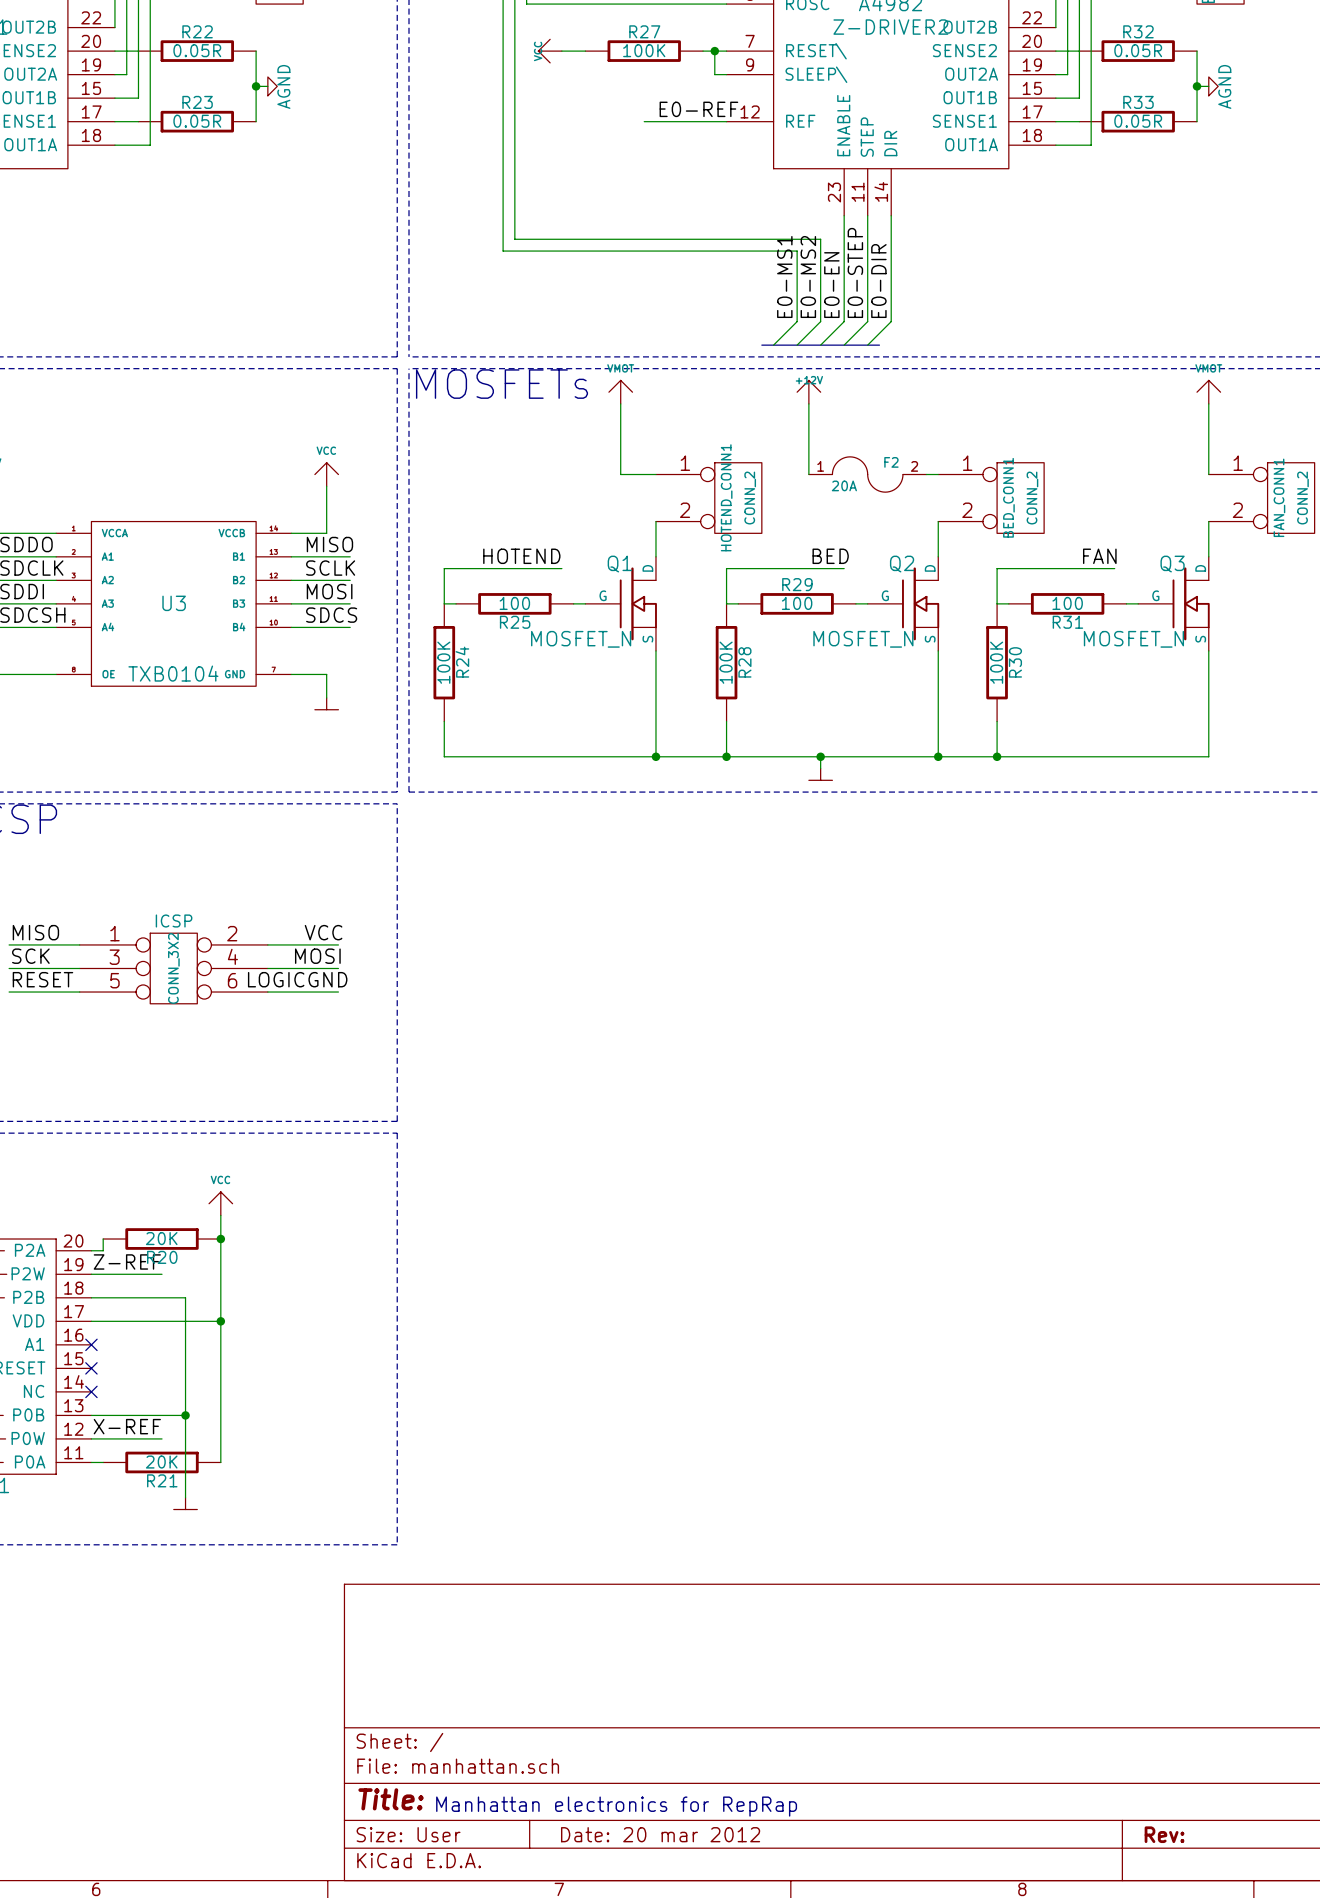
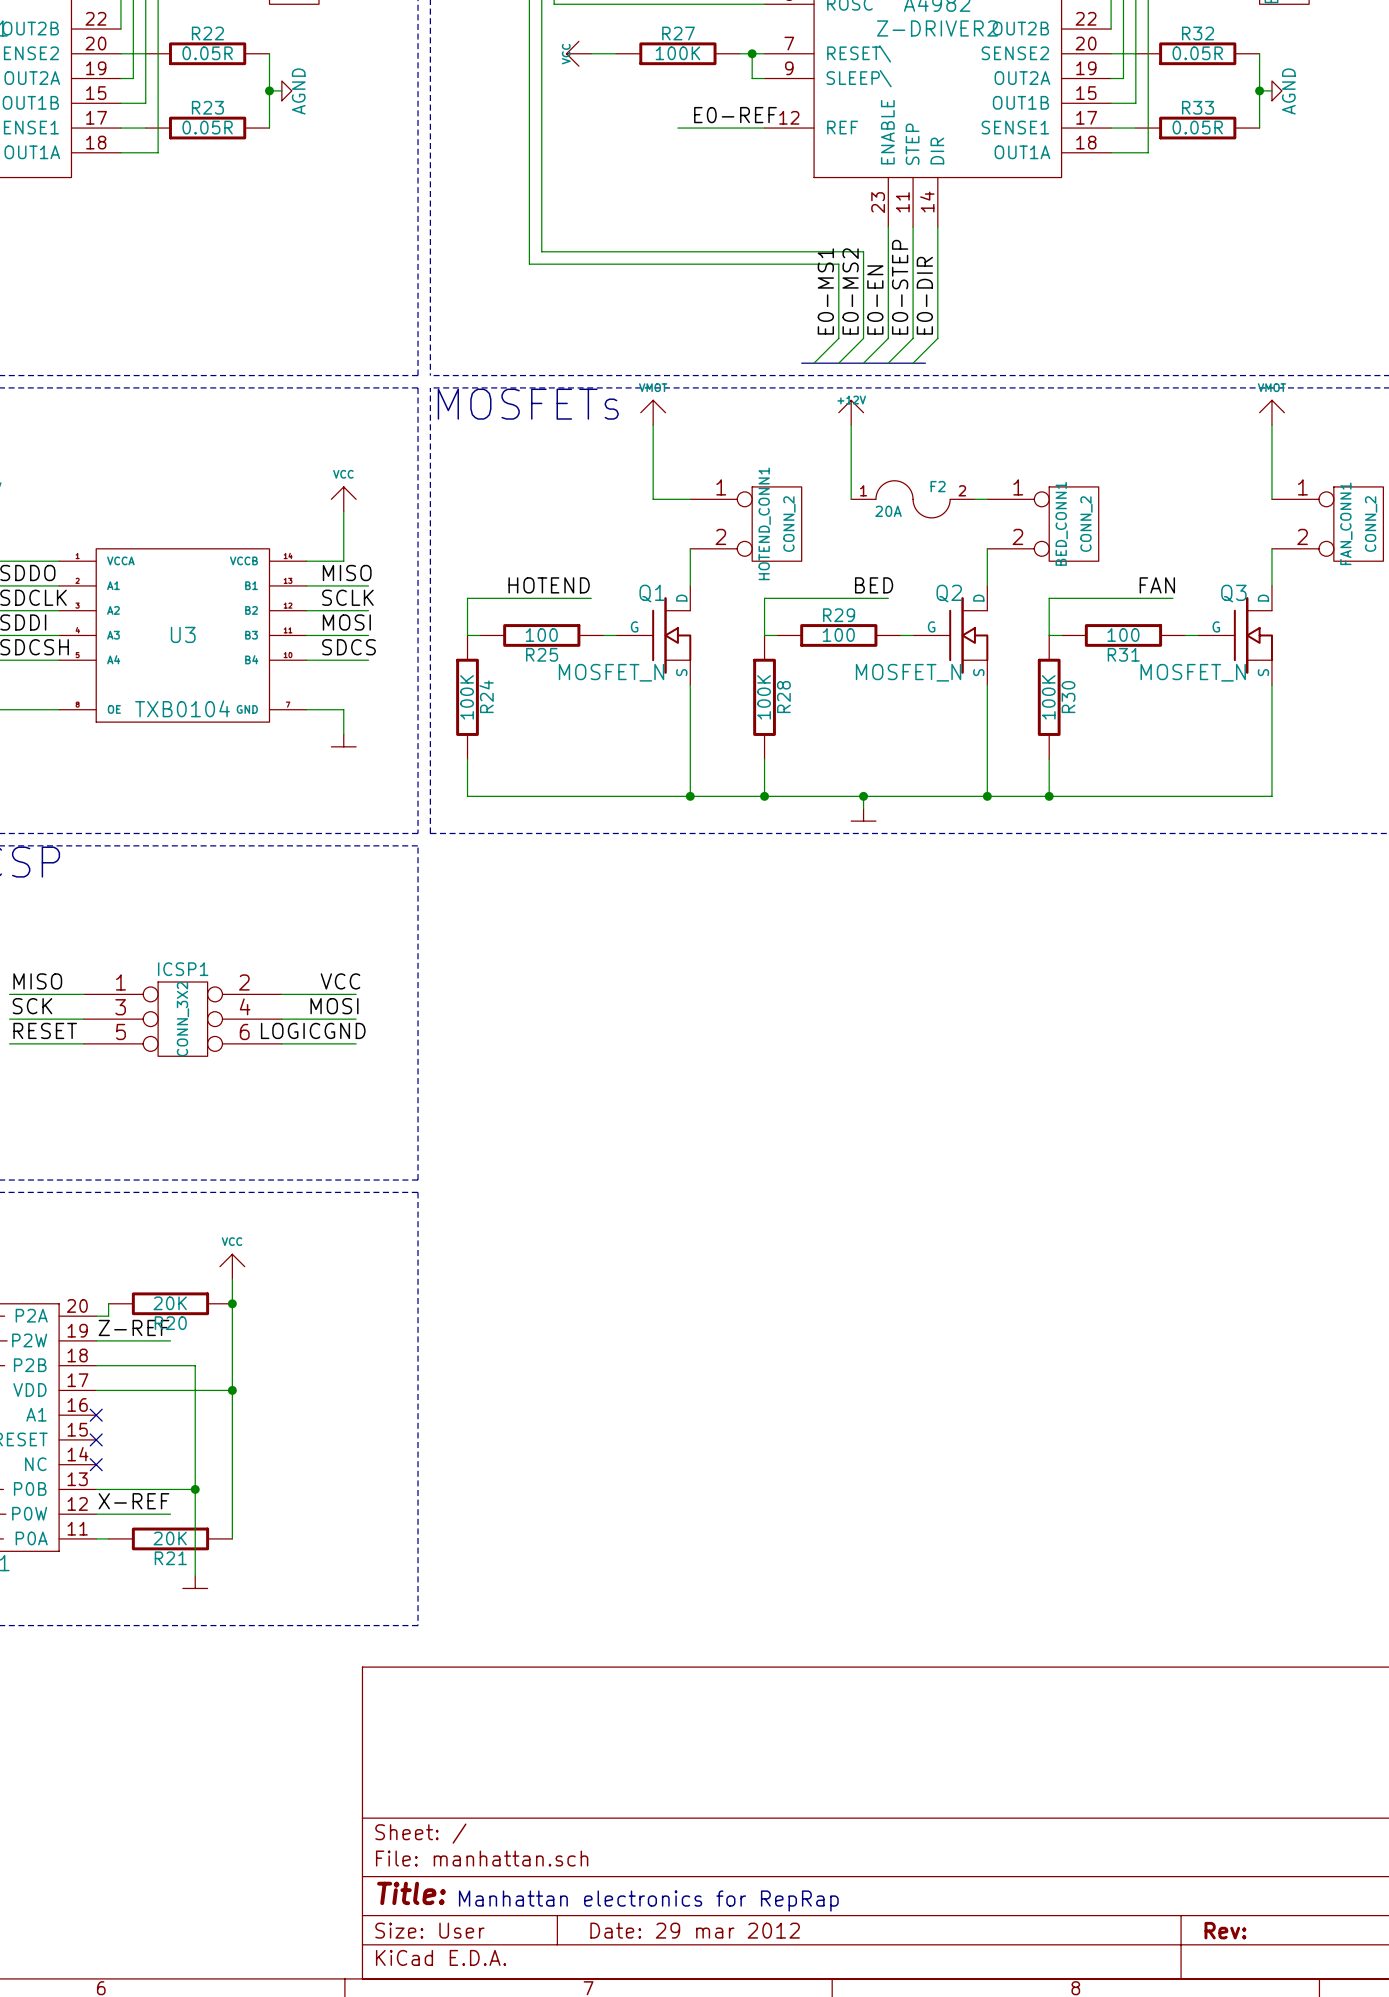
ICSP name: ICSP (174, 921) -> ICSP1 (183, 969)
title block: Date: 20 mar 2012 (660, 1834) -> Date: 29 mar 2012 (695, 1930)

